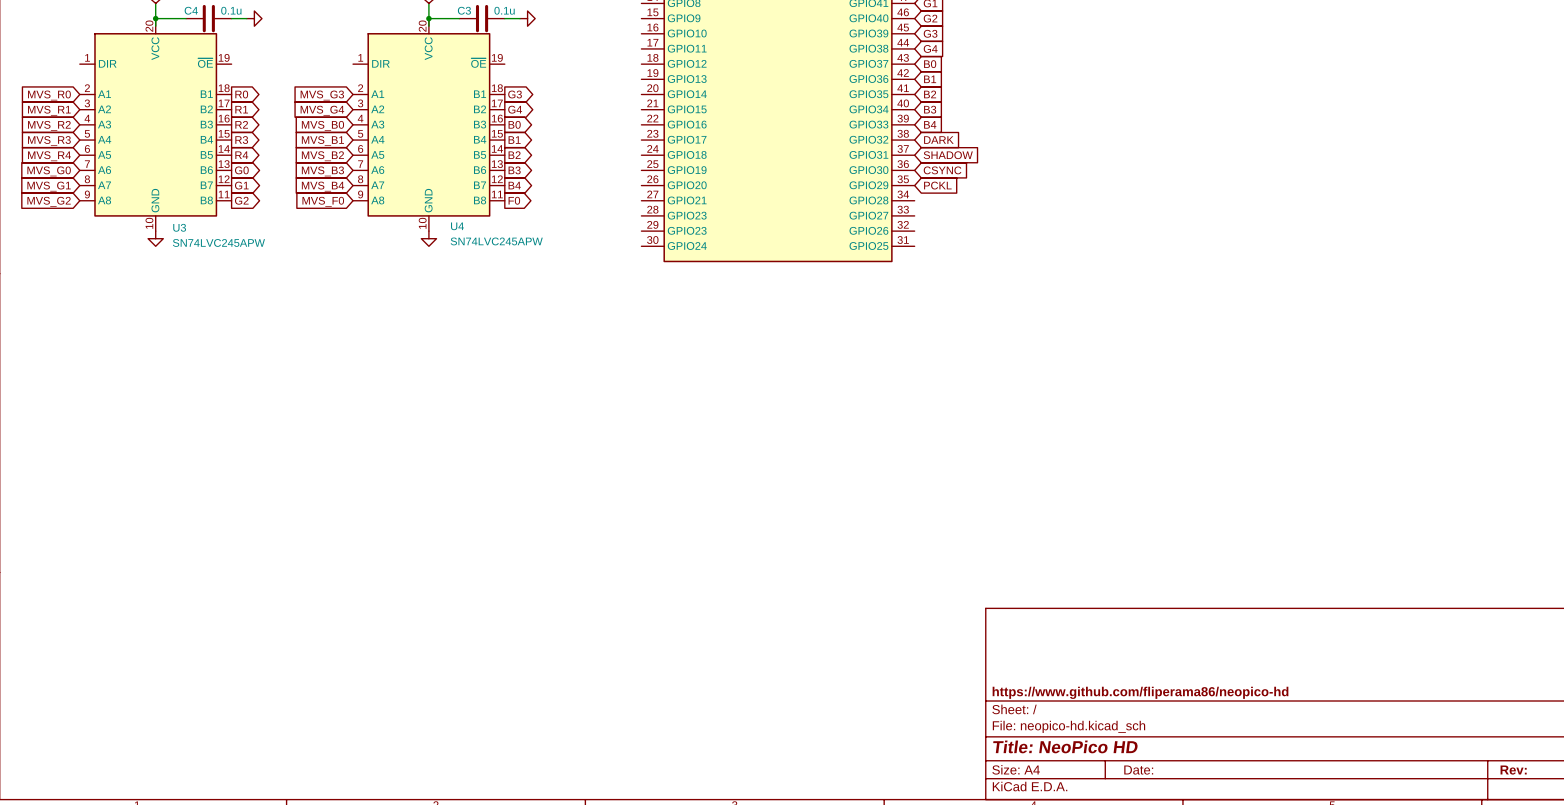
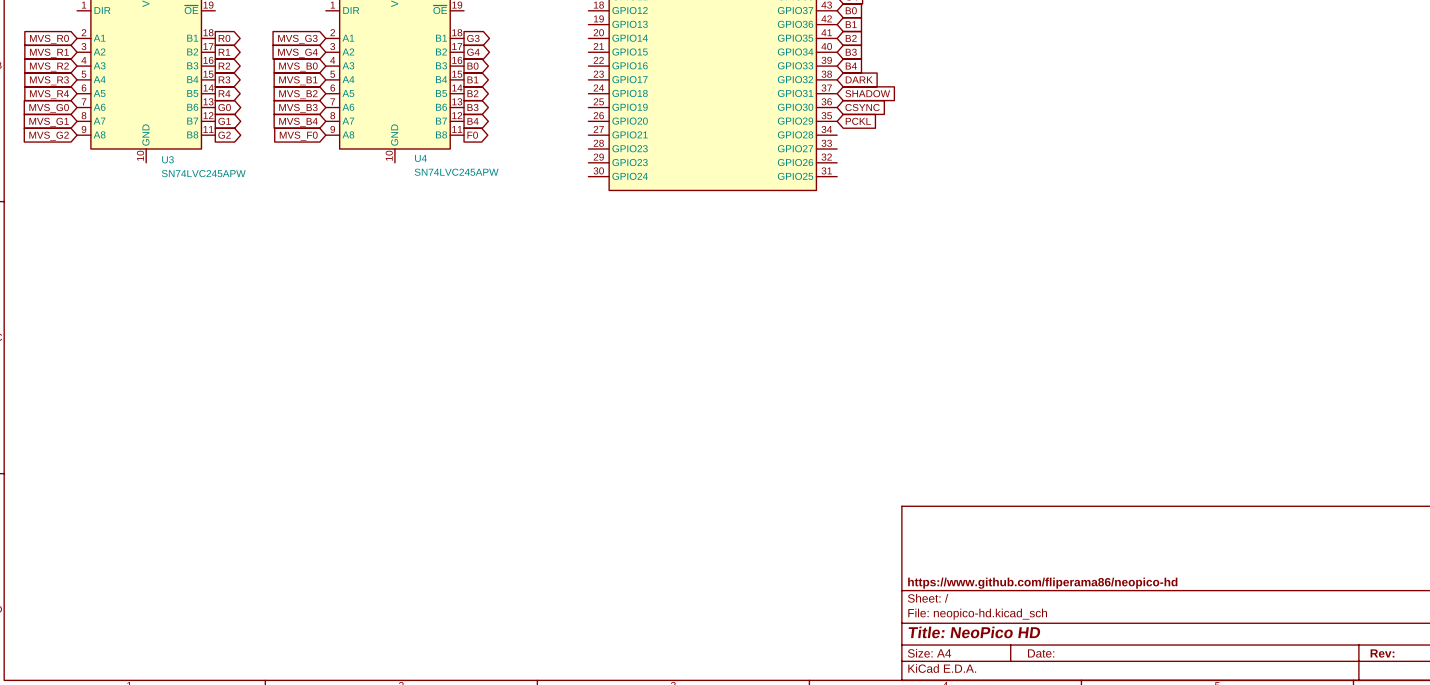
power symbol: (155, 238) -> none
power symbol: (428, 238) -> none

